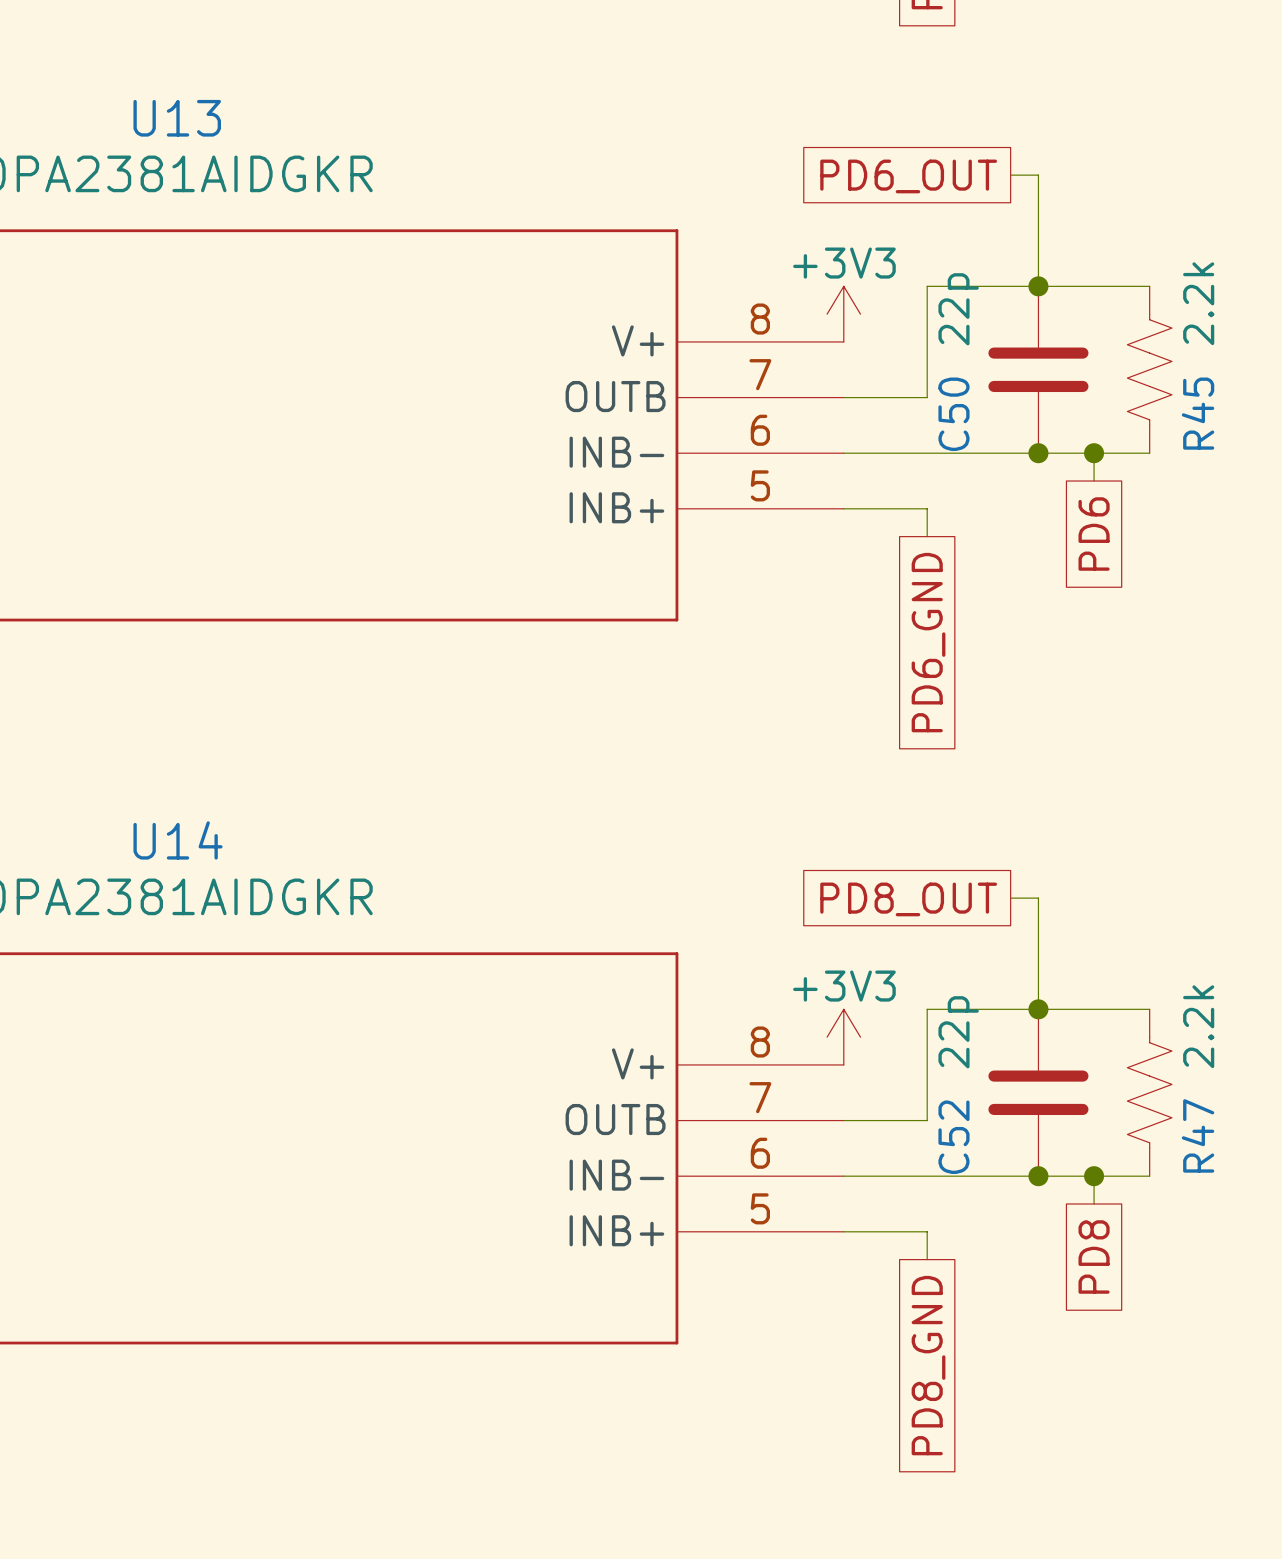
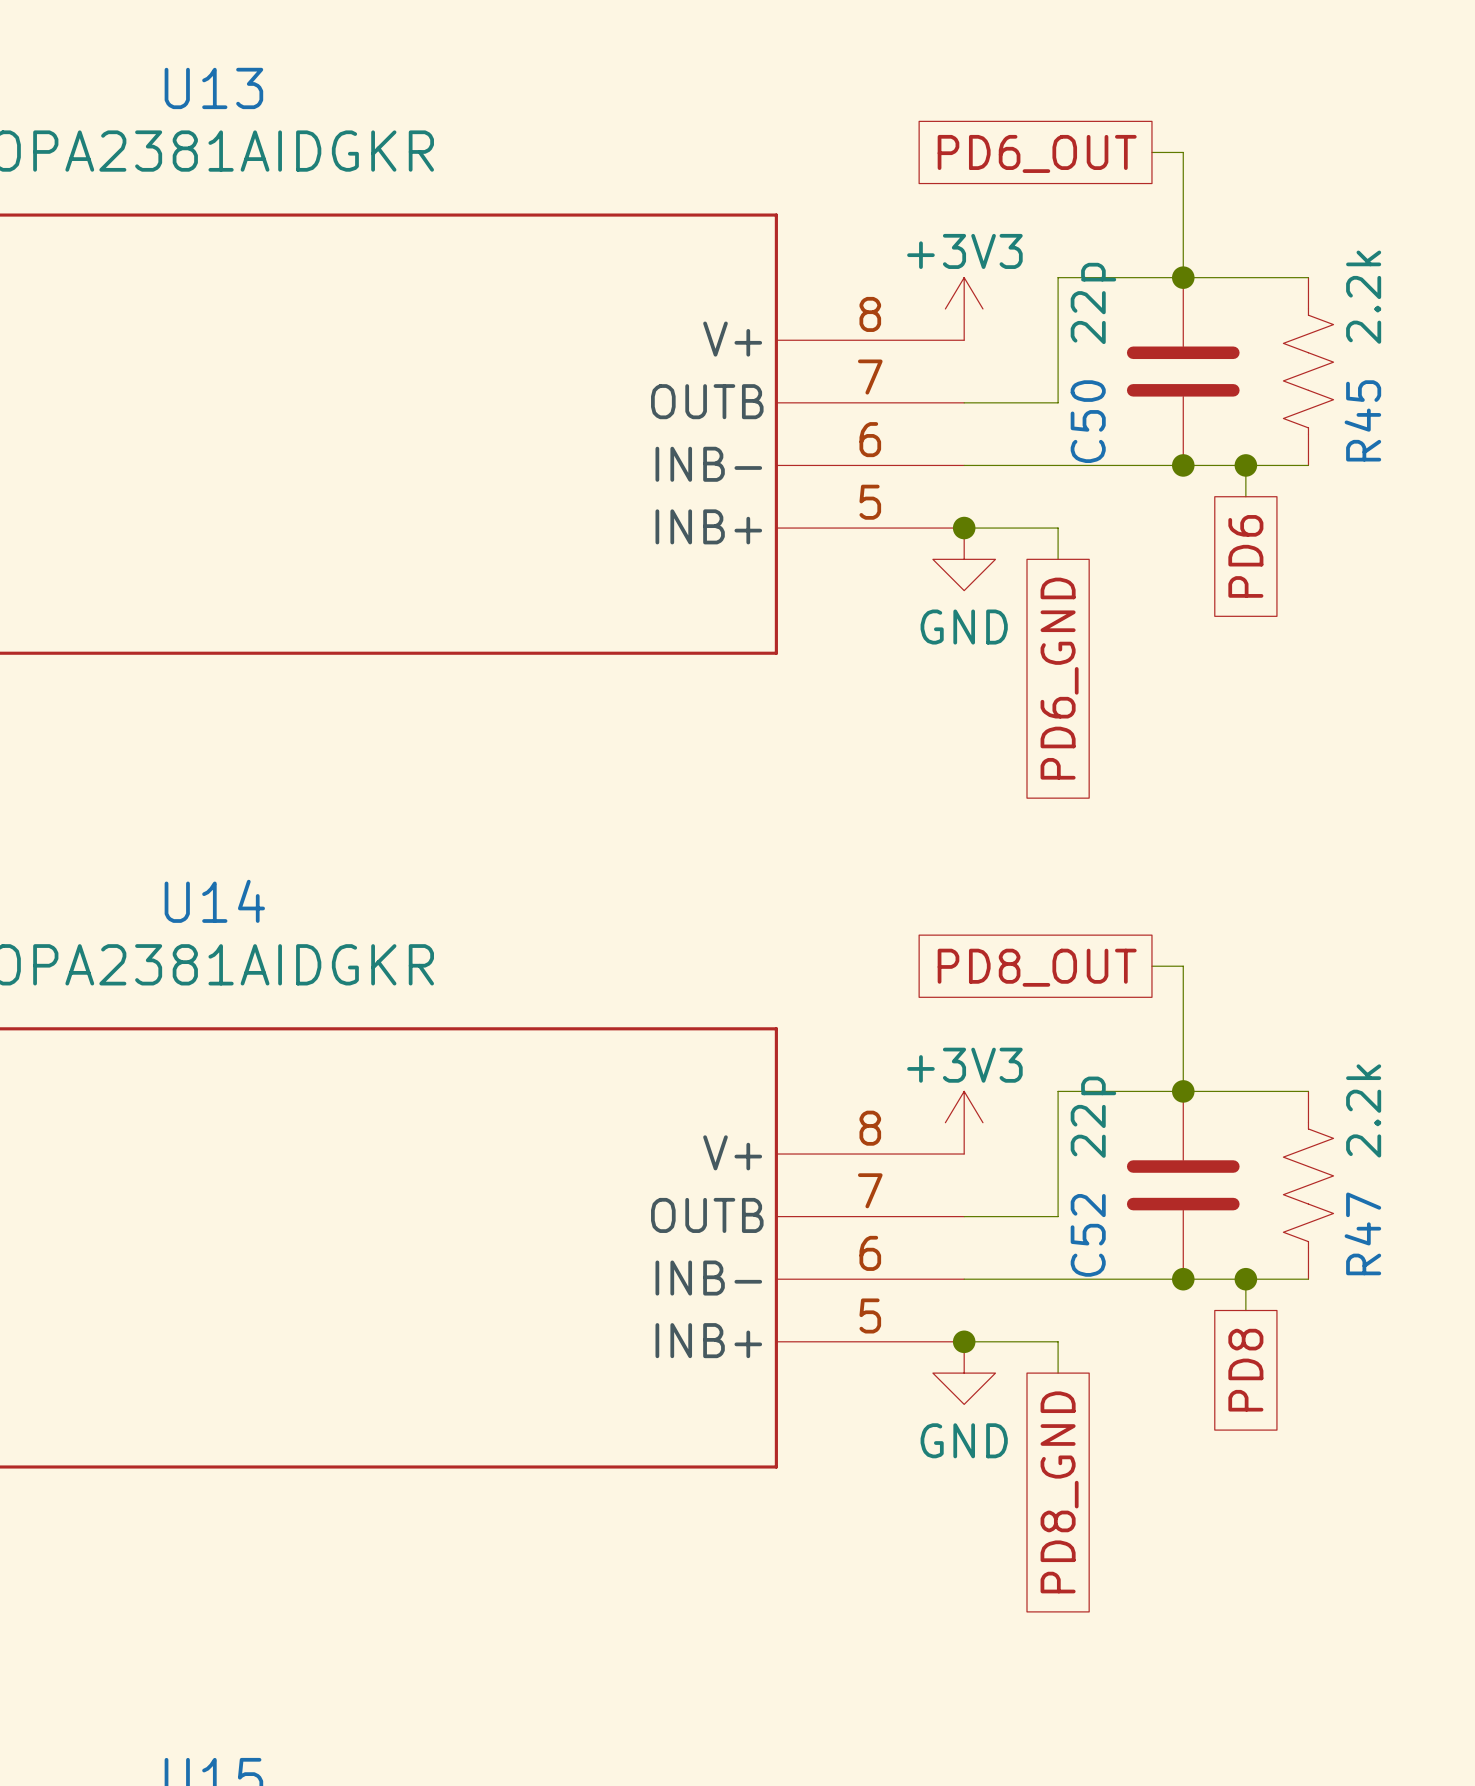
junction: none -> (964, 528)
power symbol: none -> GND (964, 559)
junction: none -> (964, 1341)
power symbol: none -> GND (964, 1373)

